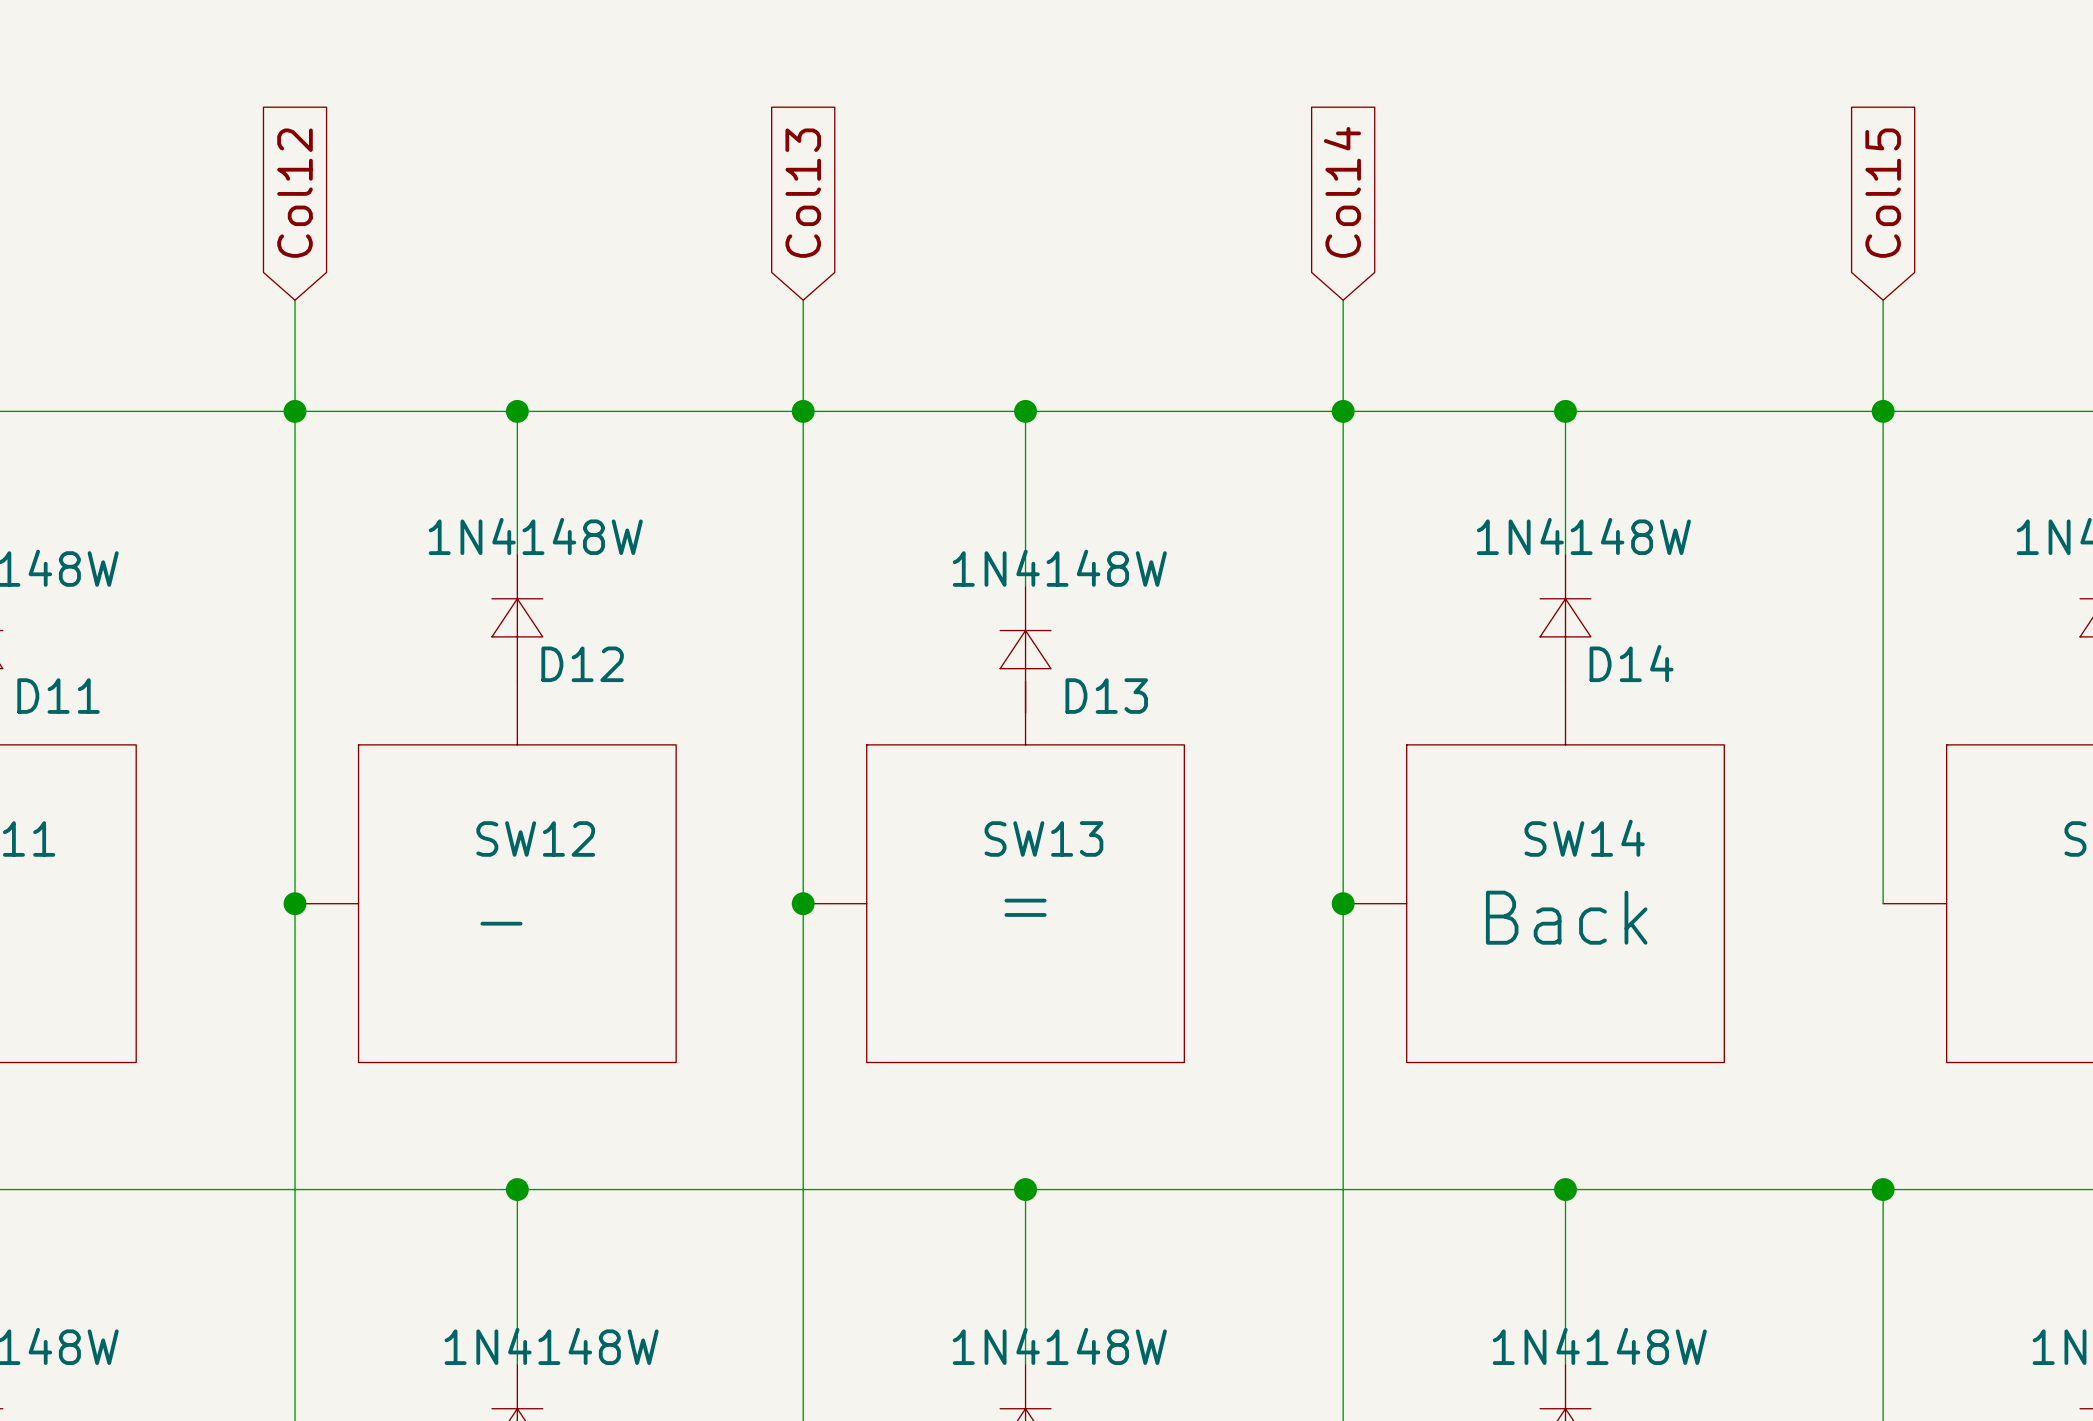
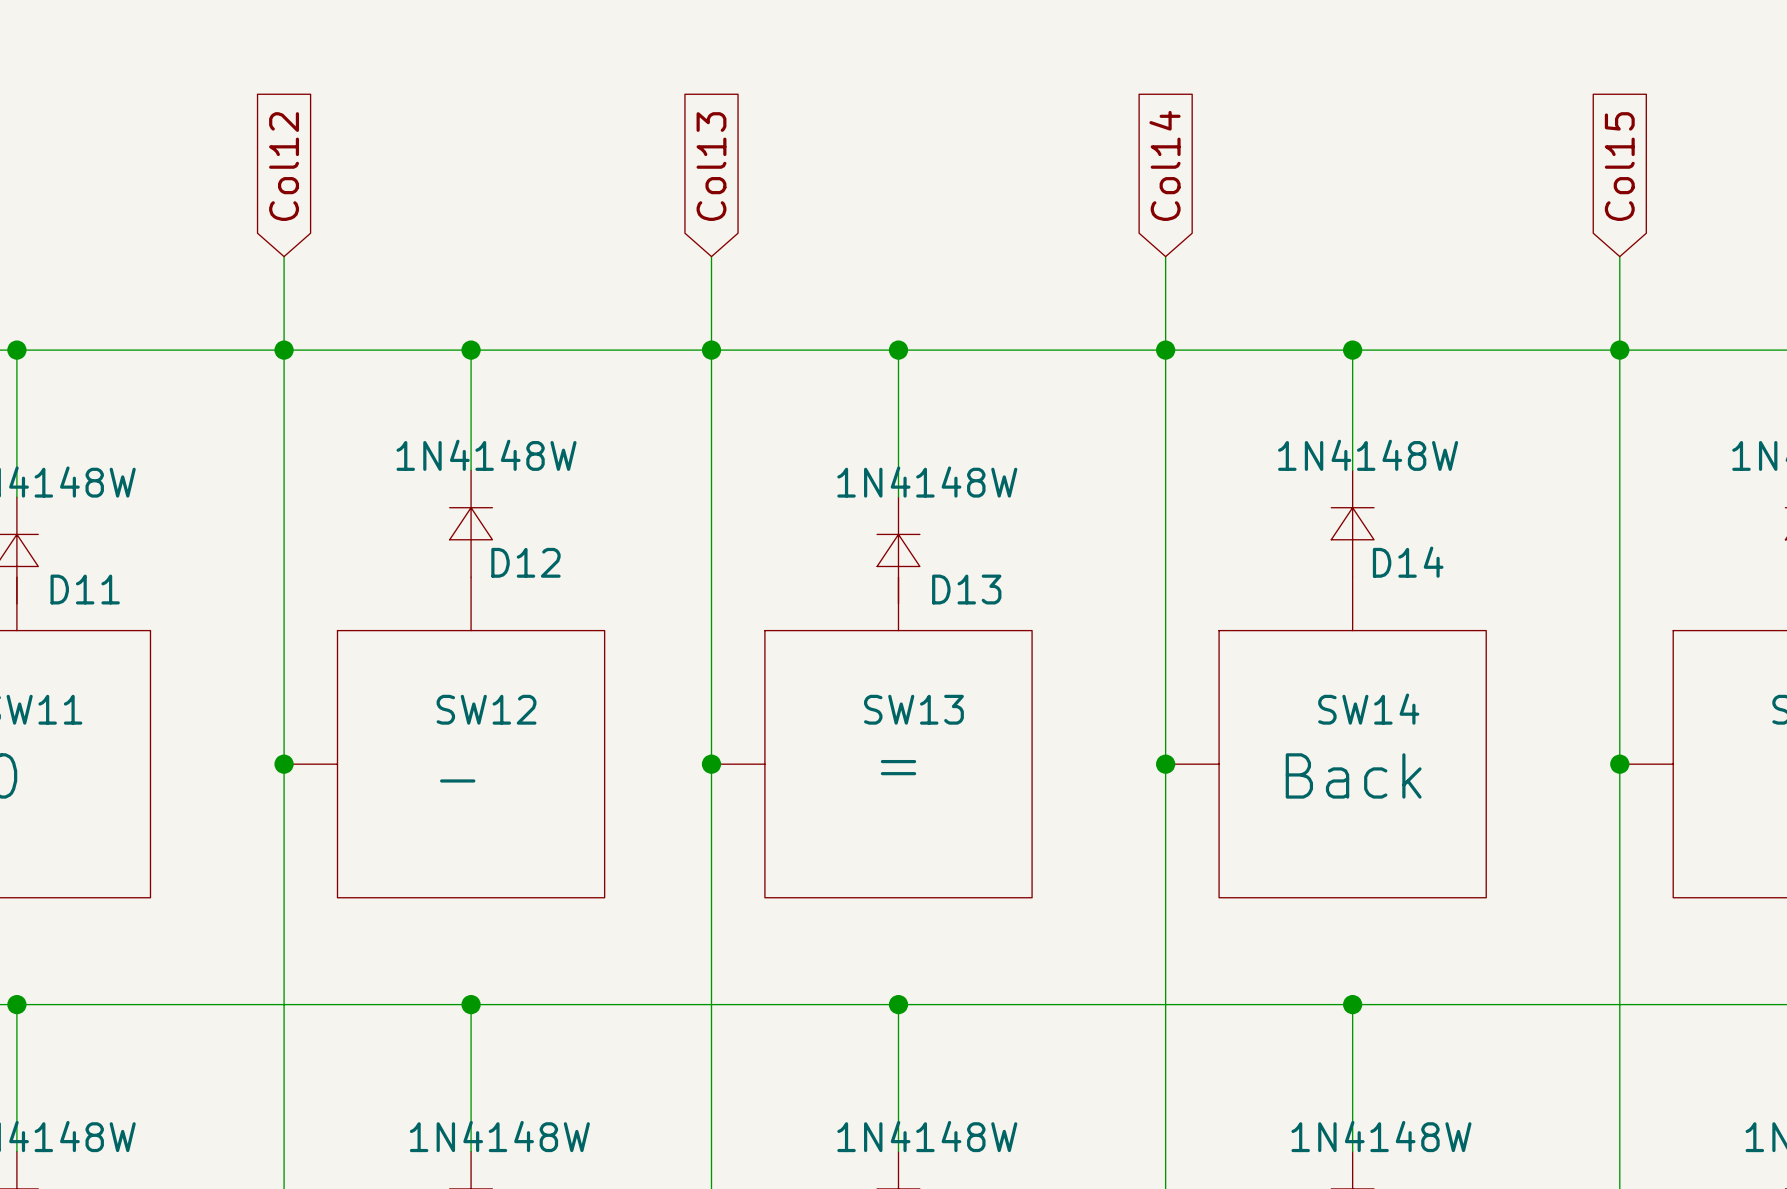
wire: none -> (1619, 764) (1619, 1004)
junction: none -> (1619, 764)
junction: (1883, 1189) -> none

